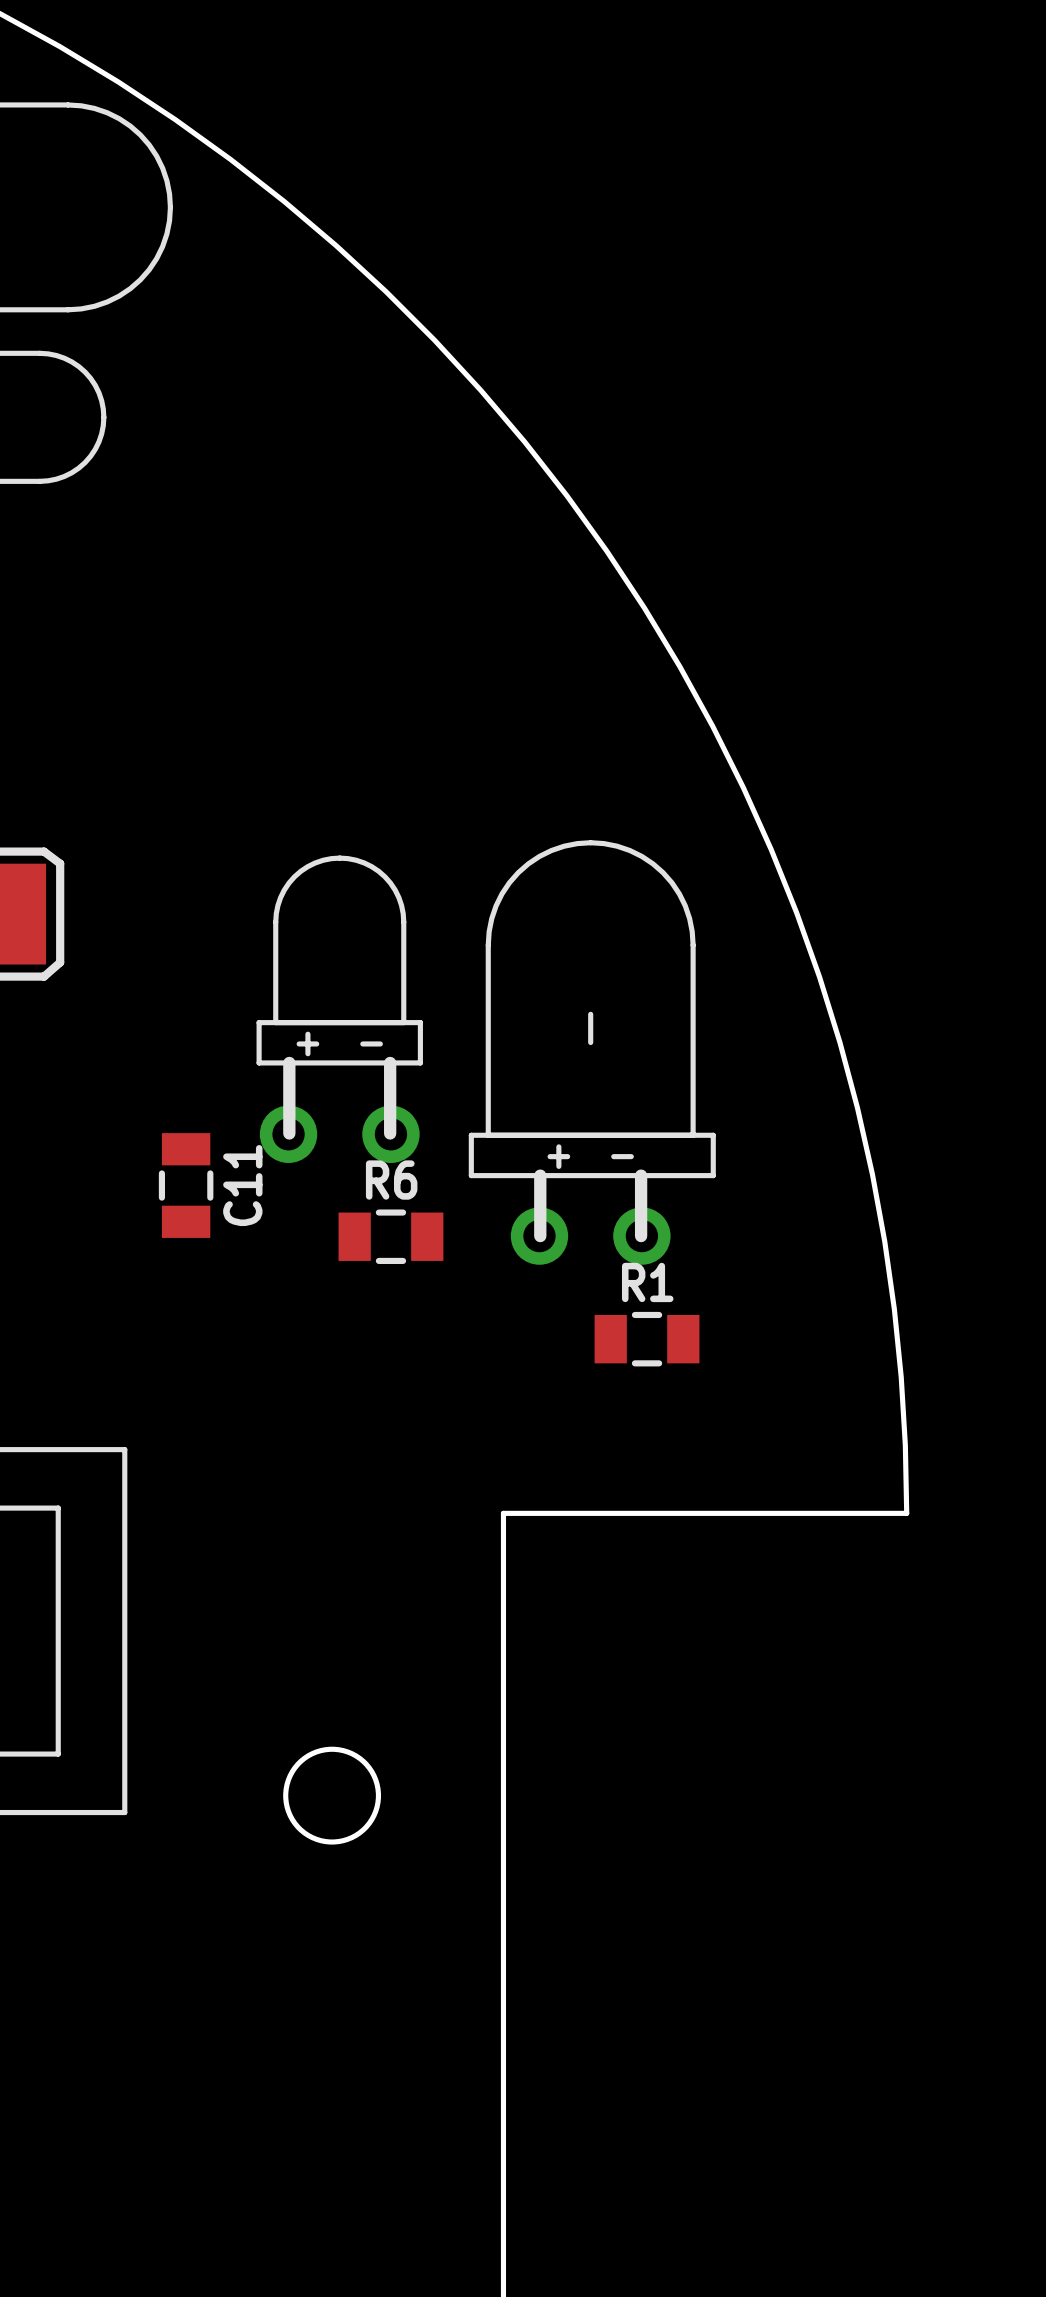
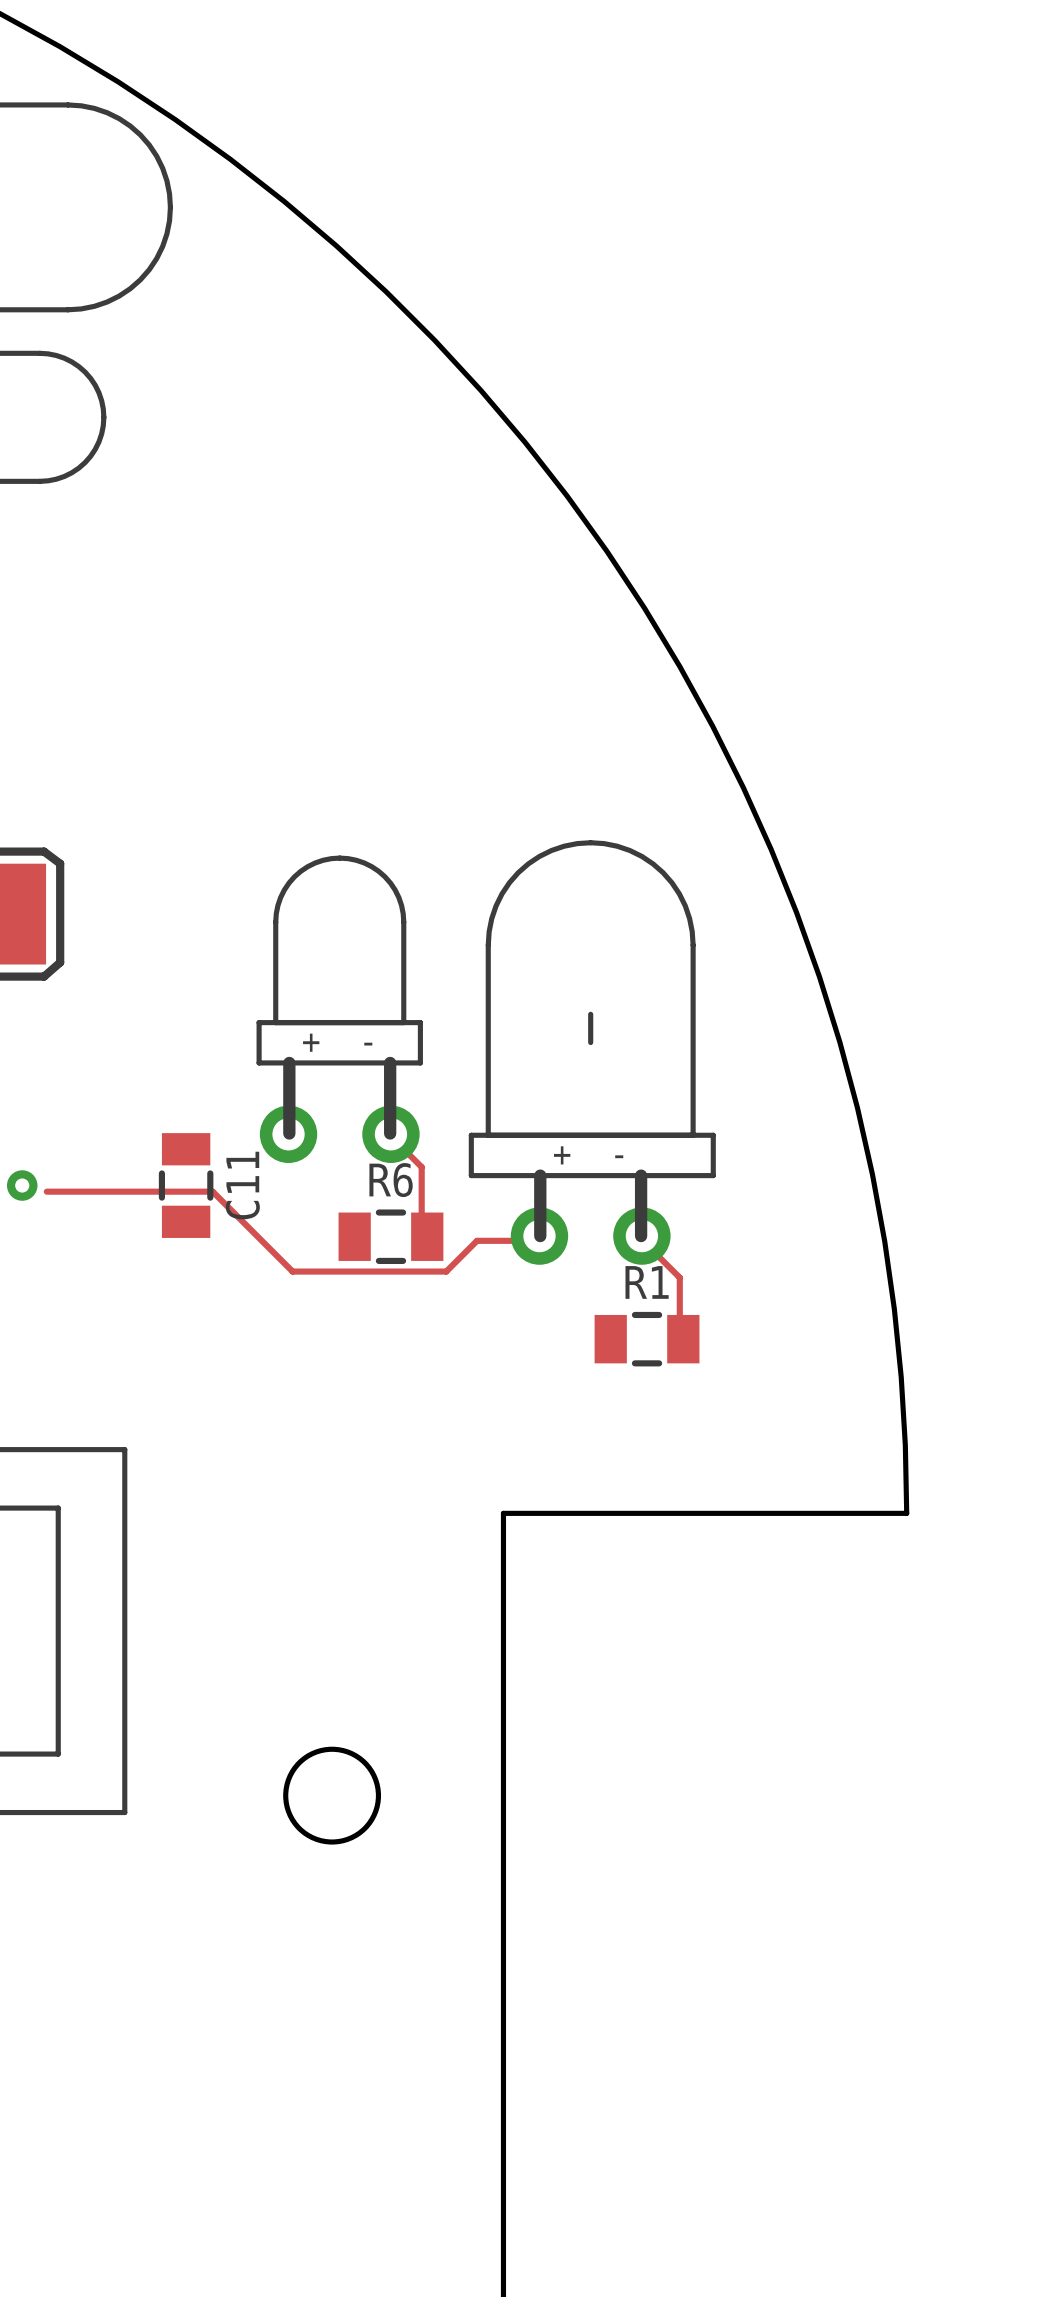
top track: none -> (390, 1134) (421, 1167) (421, 1234) (427, 1236)
via: none -> (22, 1185)
top track: none -> (46, 1191) (212, 1191) (292, 1271) (446, 1271) (477, 1240) (538, 1240) (539, 1236)
top track: none -> (641, 1236) (642, 1240) (679, 1277) (679, 1339) (683, 1339)

